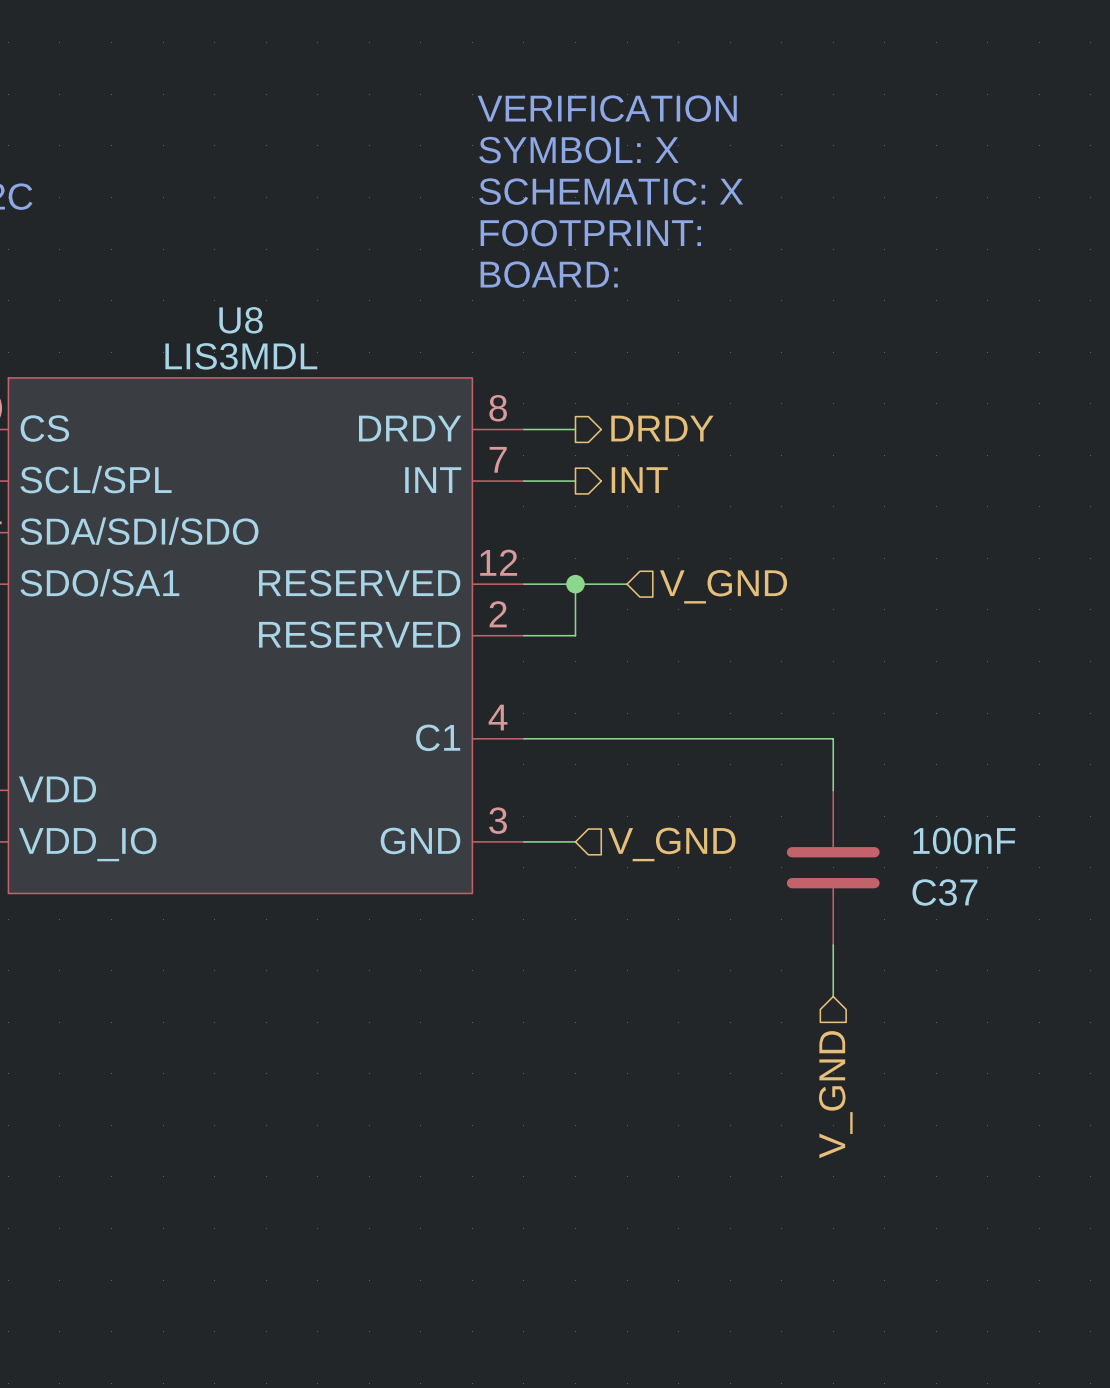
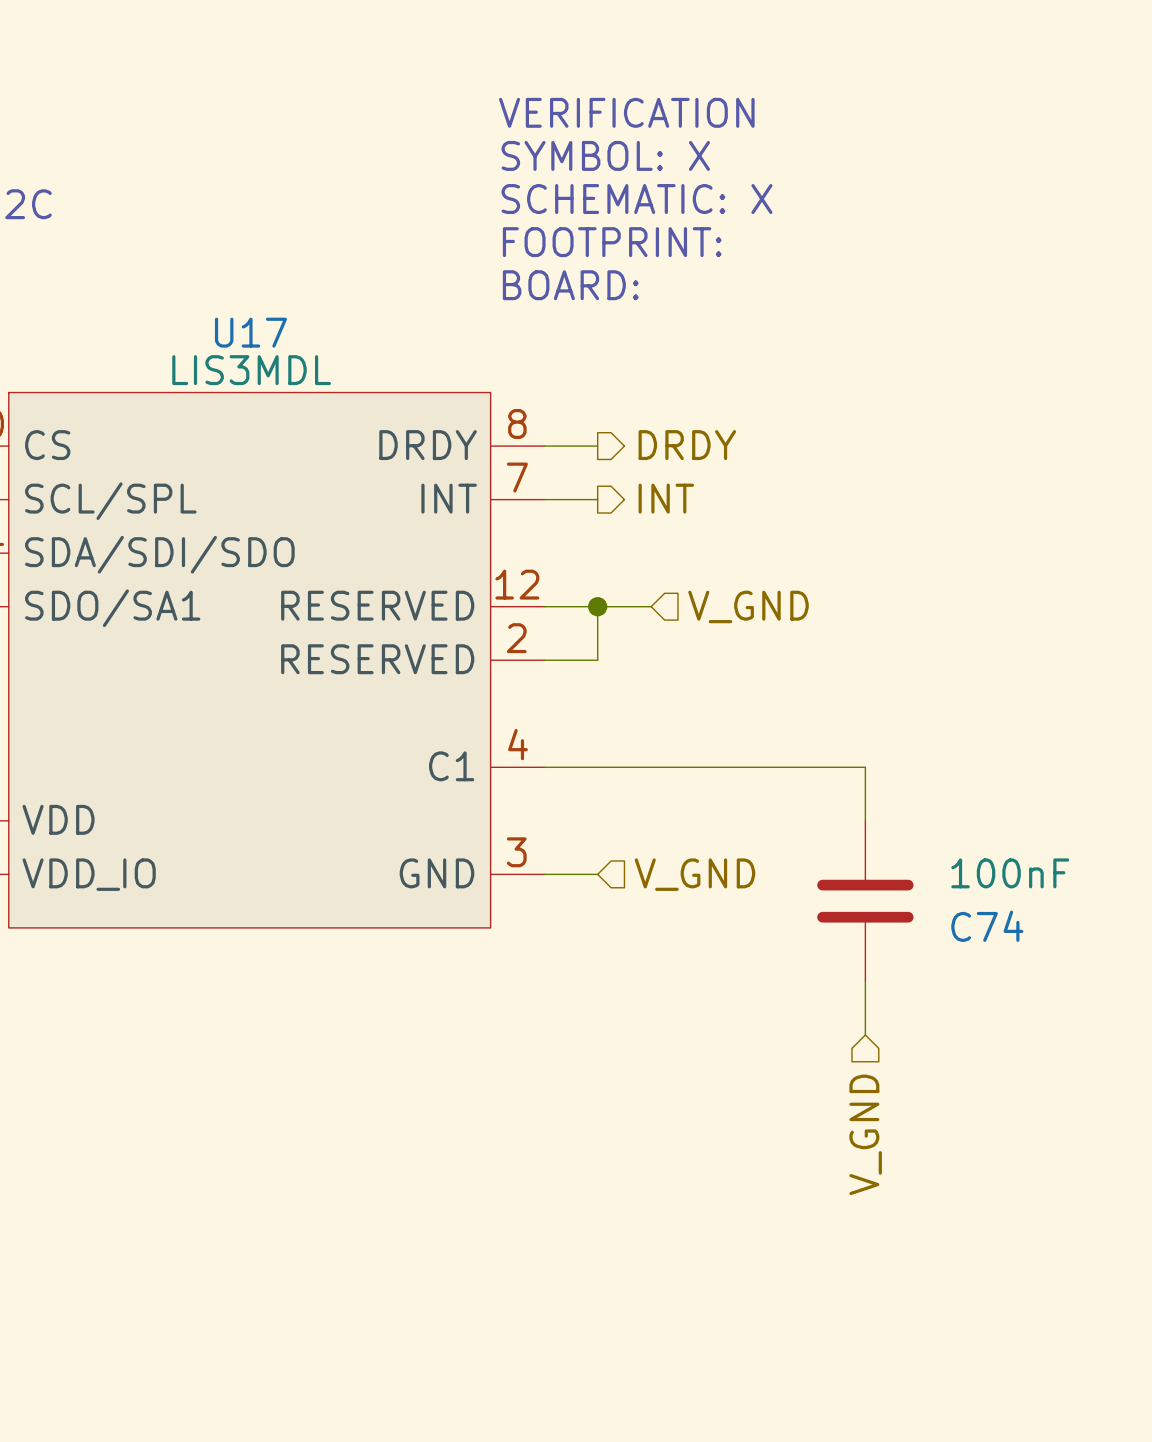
U8 name: U8 (241, 320) -> U17 (250, 332)
C37 name: C37 (944, 892) -> C74 (987, 926)

